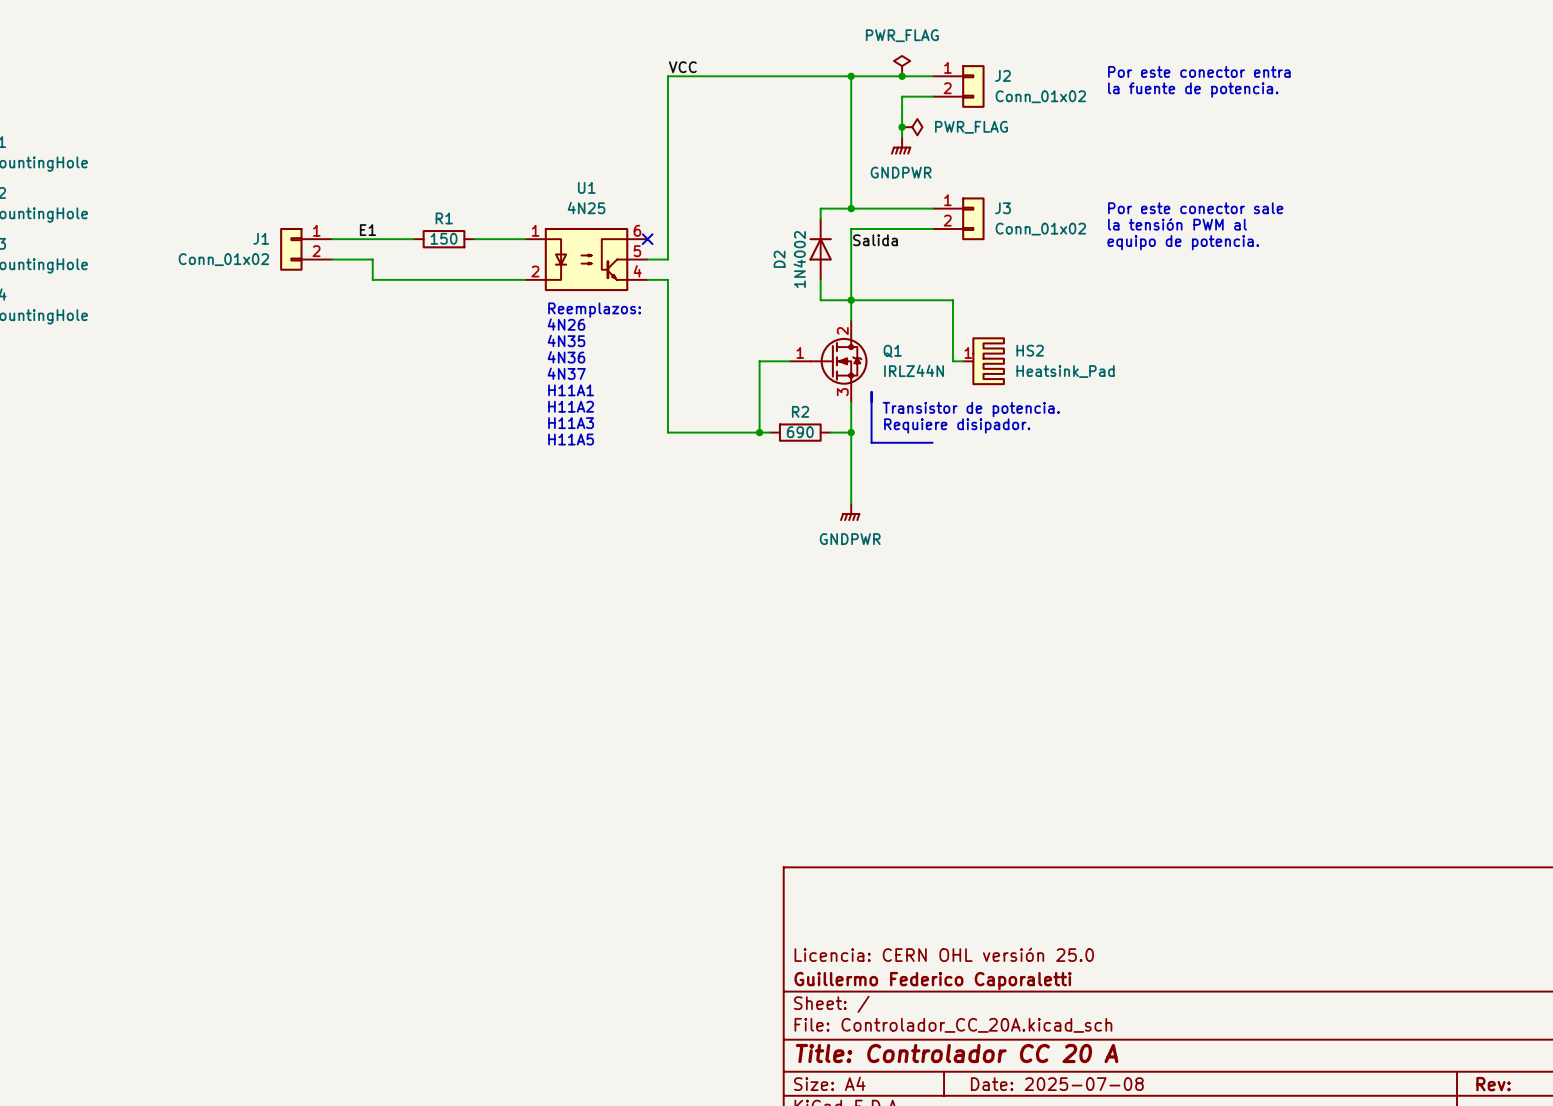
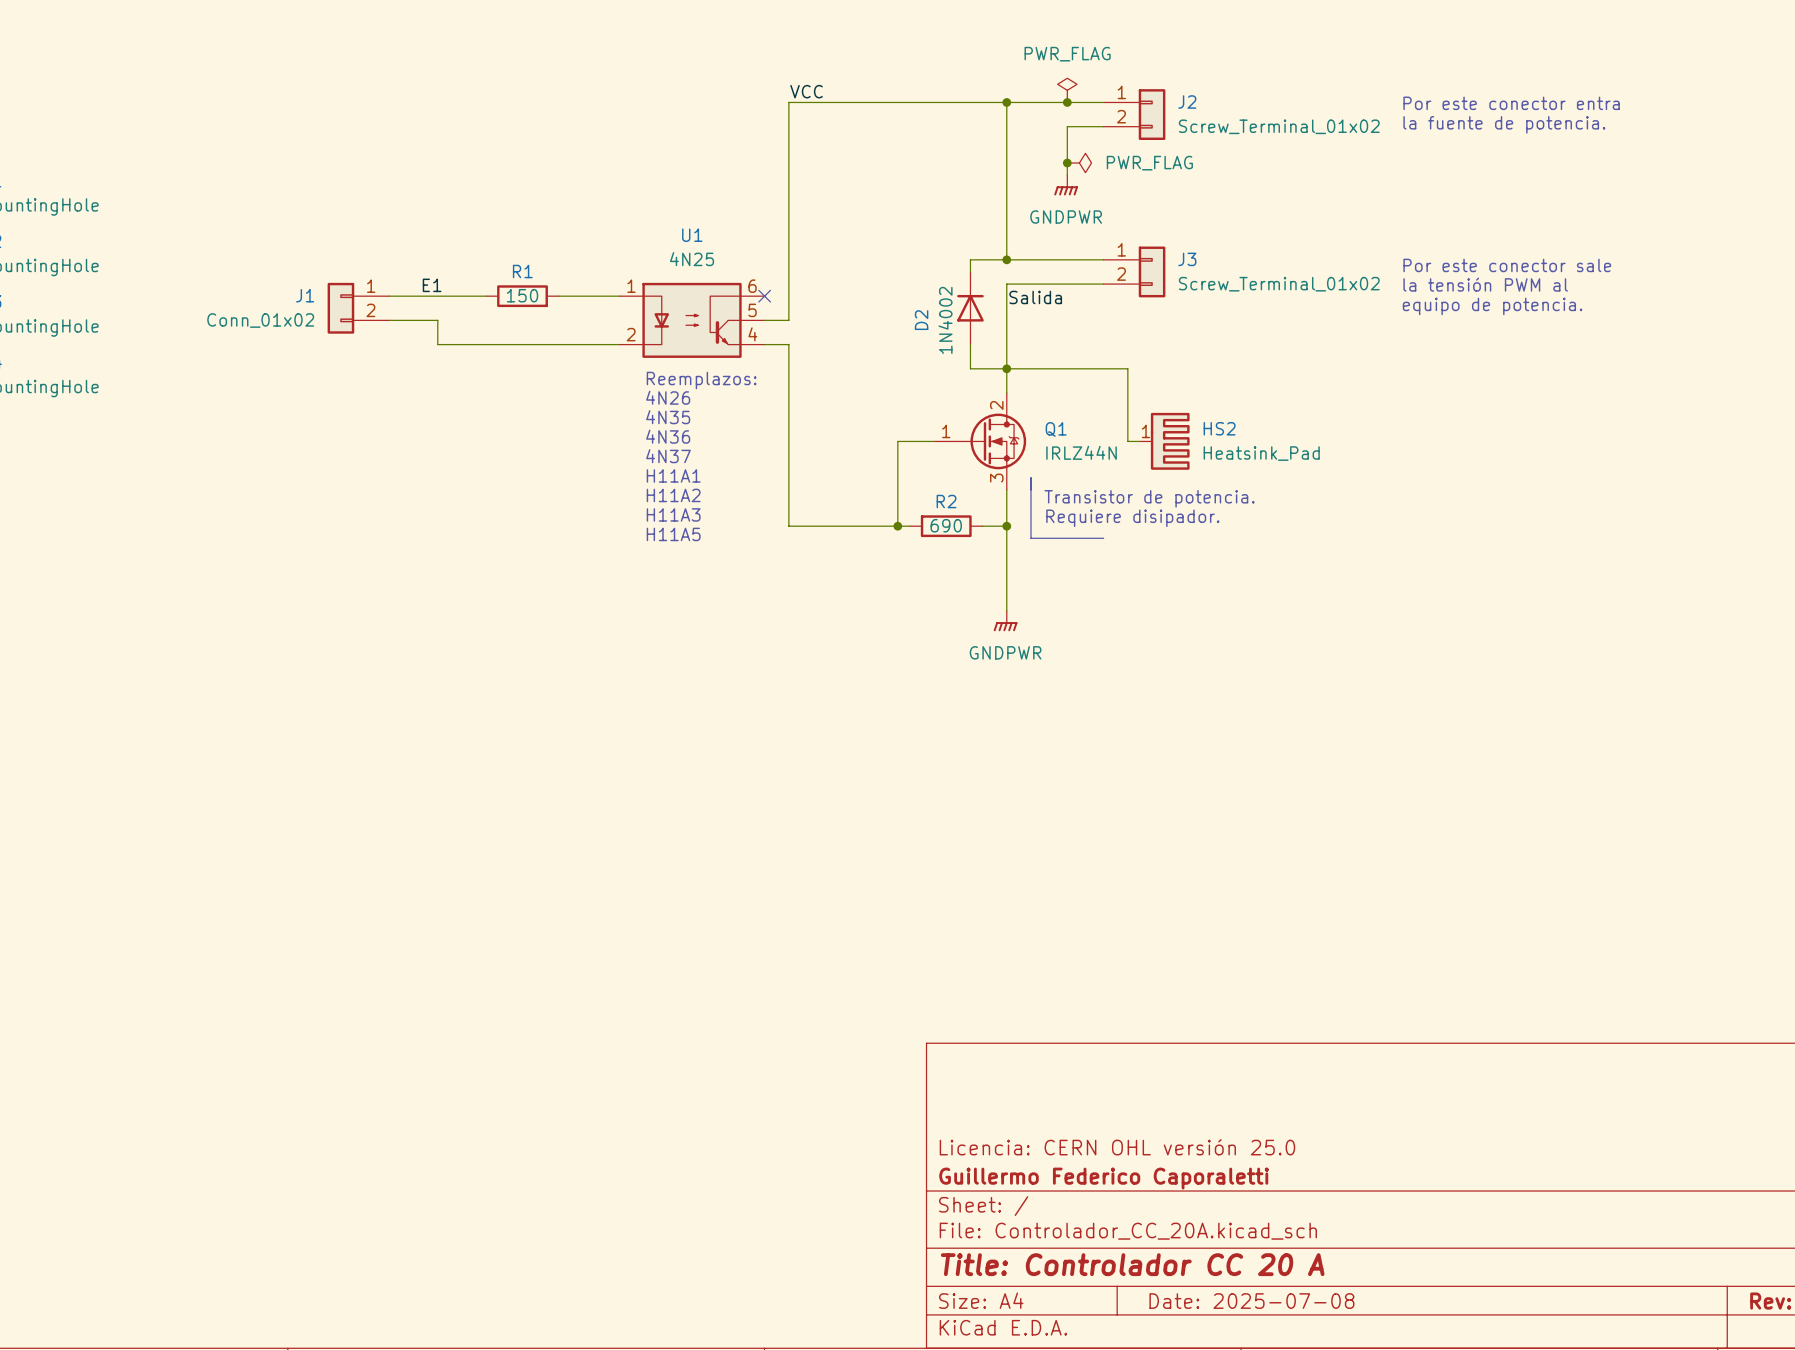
text position: Por este conector entra (1199, 71) -> Por este conector entra (1511, 103)
text position: la fuente de potencia. (1193, 90) -> la fuente de potencia. (1504, 124)
J2 value: Conn_01x02 (1040, 96) -> Screw_Terminal_01x02 (1279, 126)
text position: Por este conector sale (1195, 208) -> Por este conector sale (1507, 265)
text position: la tensión PWM al (1177, 224) -> la tensión PWM al (1485, 284)
J3 value: Conn_01x02 (1040, 229) -> Screw_Terminal_01x02 (1279, 284)
text position: equipo de potencia. (1183, 242) -> equipo de potencia. (1492, 306)

